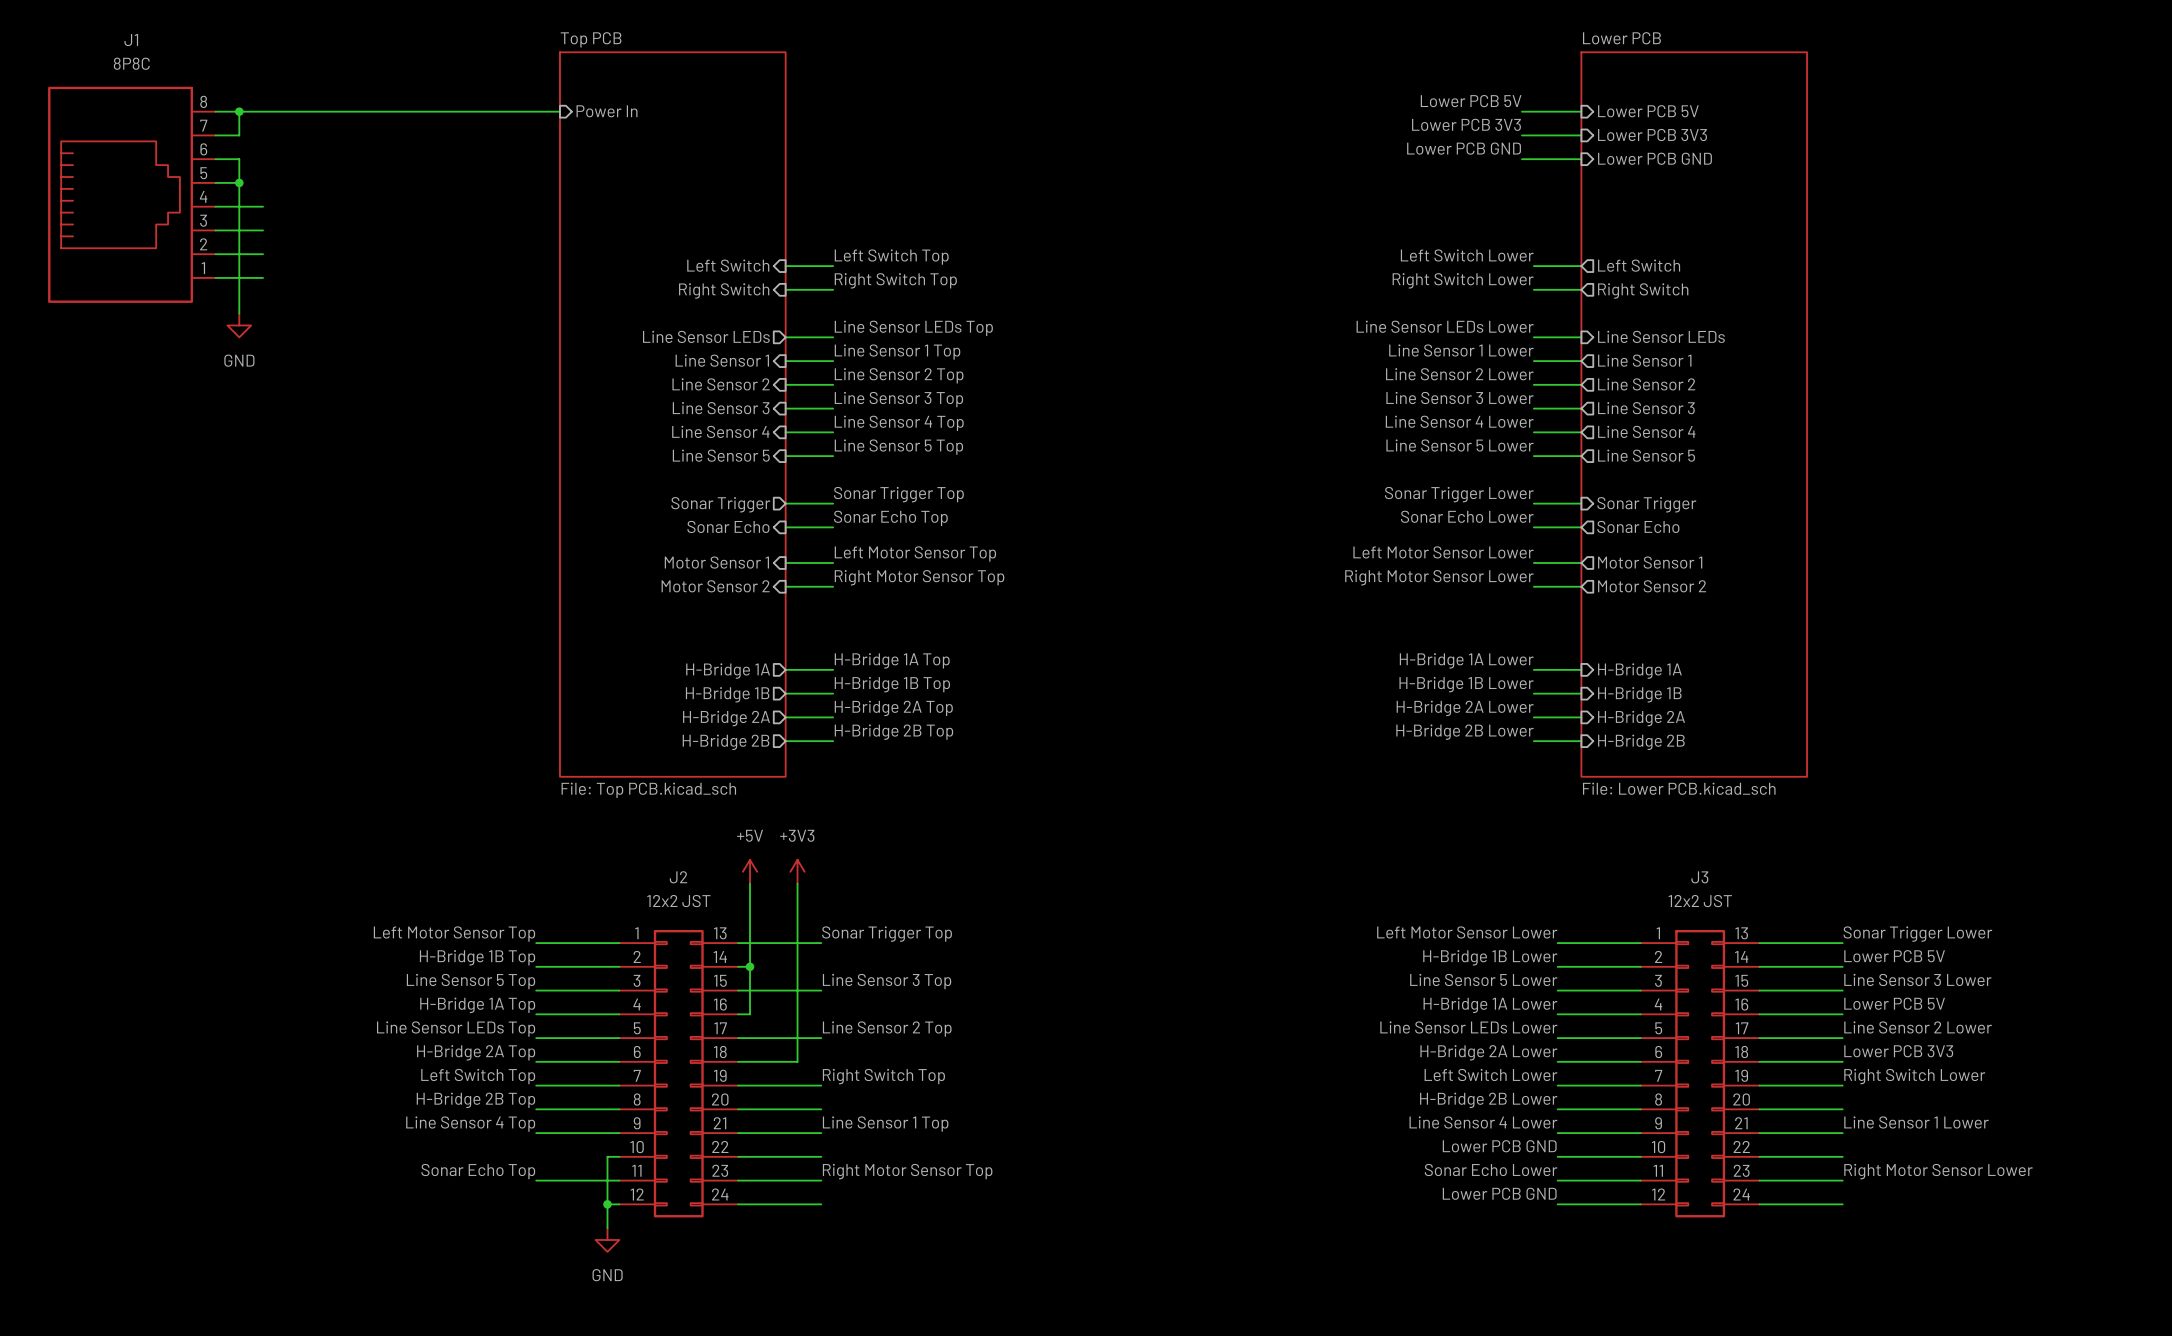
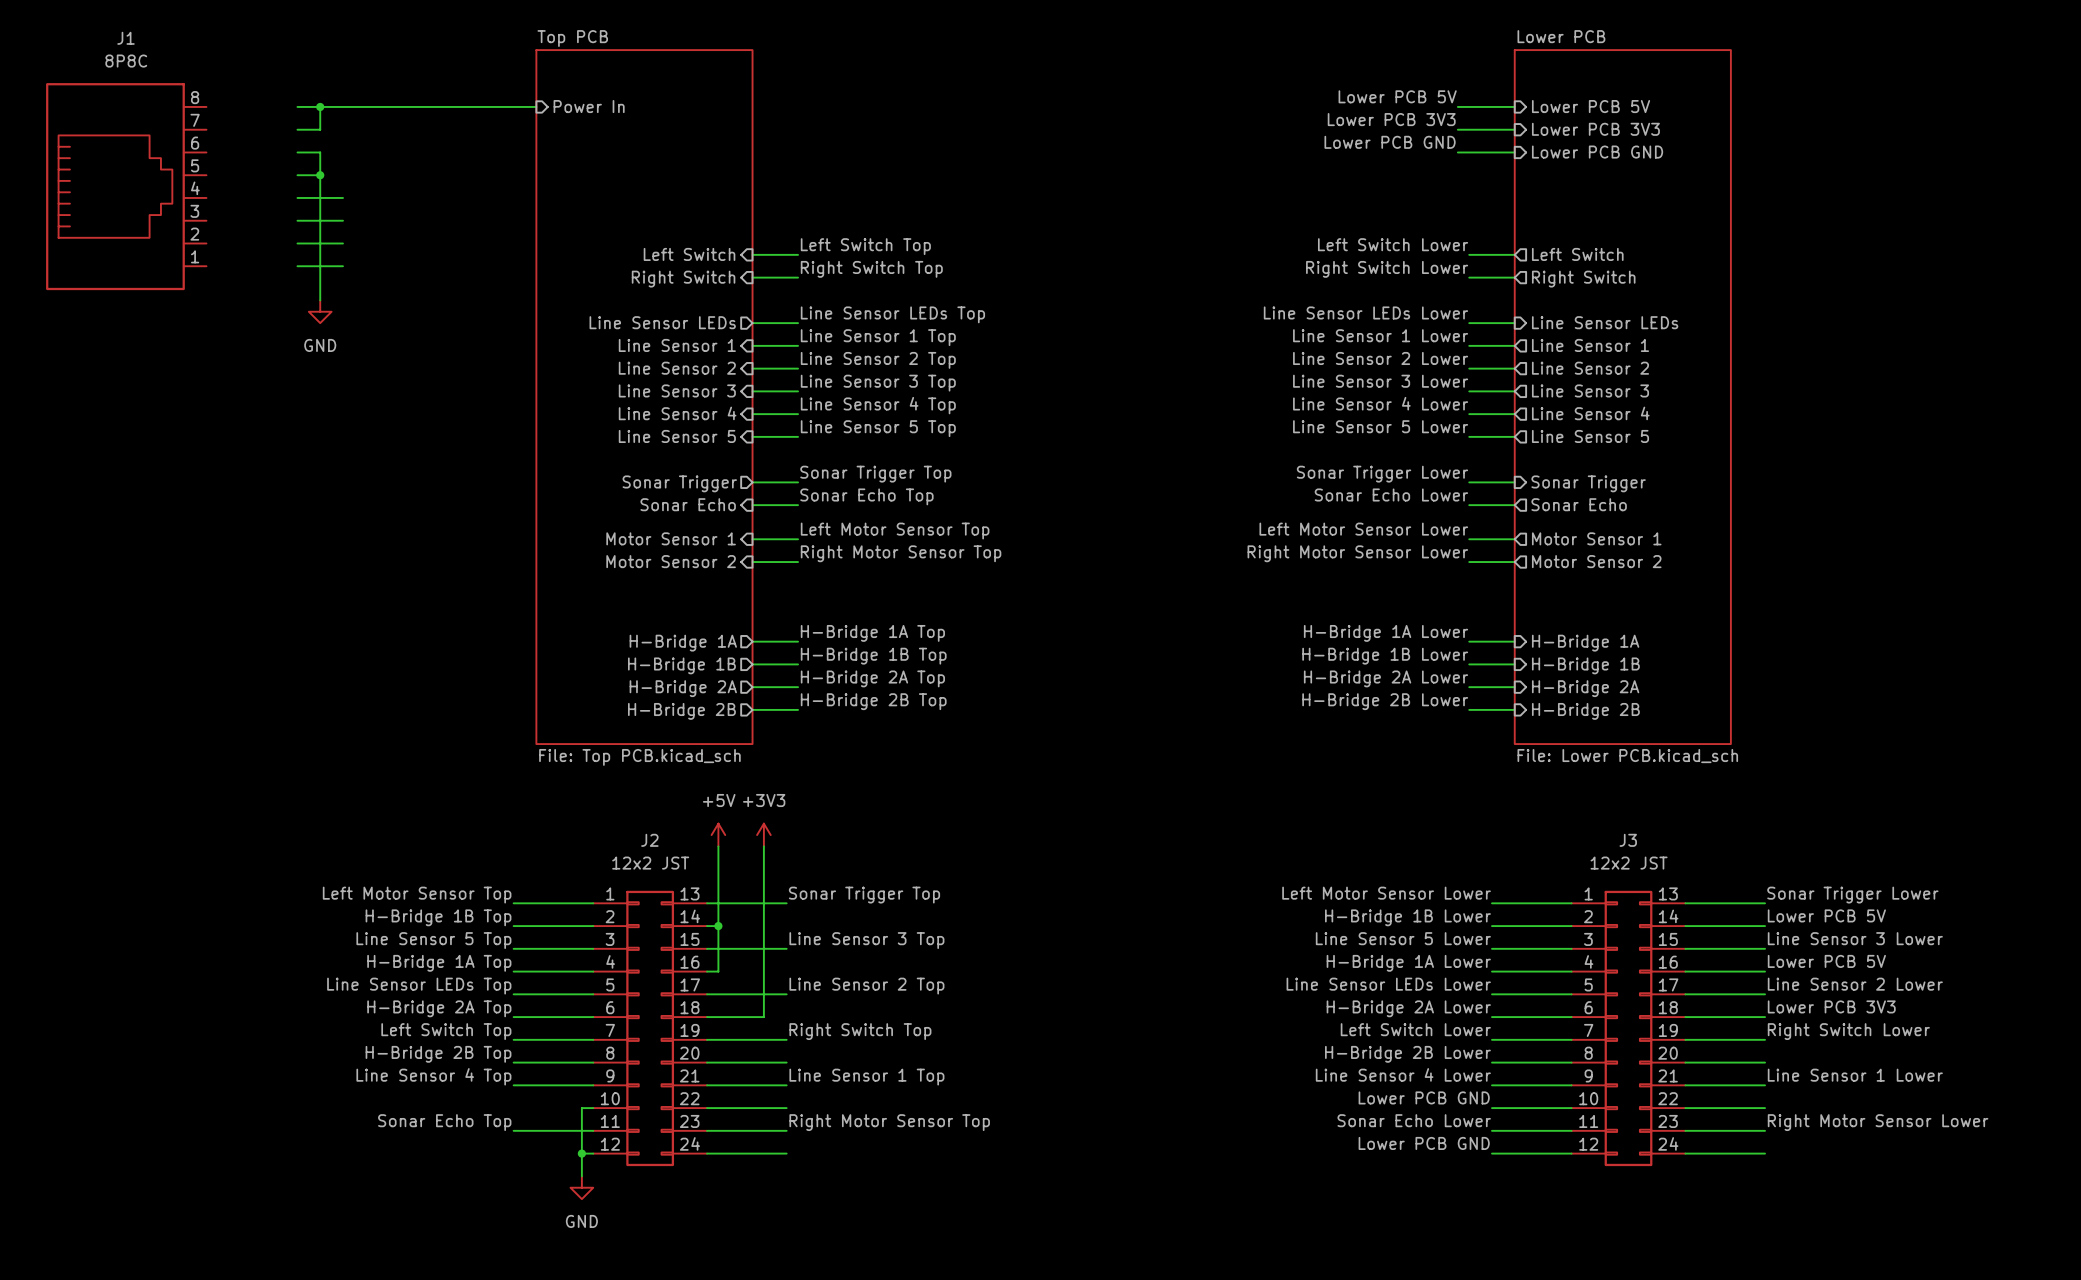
wire: (215, 111) (310, 111) -> none
wire: (239, 111) (239, 135) (215, 135) -> (320, 106) (320, 129) (297, 129)
junction: (239, 111) -> none
junction: none -> (320, 106)
wire: (215, 159) (239, 159) (239, 313) -> (297, 152) (320, 152) (320, 300)
wire: (215, 182) (239, 182) -> (297, 175) (320, 175)
junction: (239, 182) -> none
junction: none -> (320, 175)
wire: (215, 206) (263, 206) -> (297, 197) (342, 197)
wire: (215, 230) (263, 230) -> (297, 220) (342, 220)
wire: (215, 254) (263, 254) -> (297, 243) (342, 243)
wire: (215, 277) (263, 277) -> (297, 266) (342, 266)
power symbol position: GND (239, 325) -> GND (320, 311)

